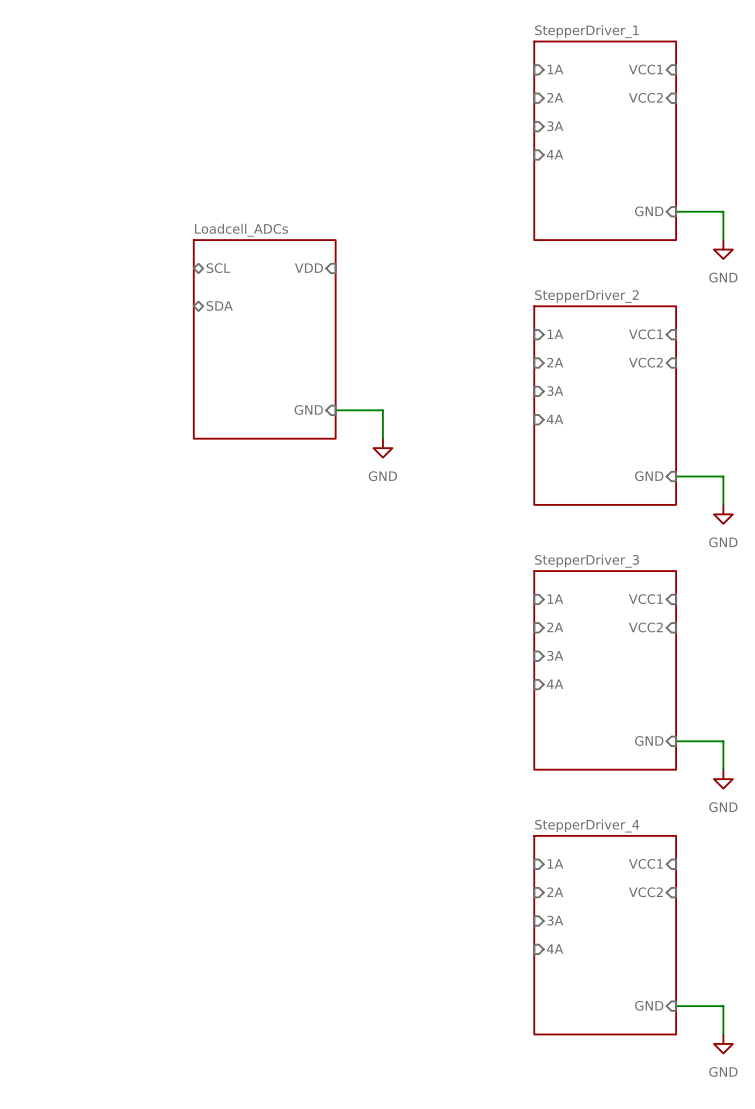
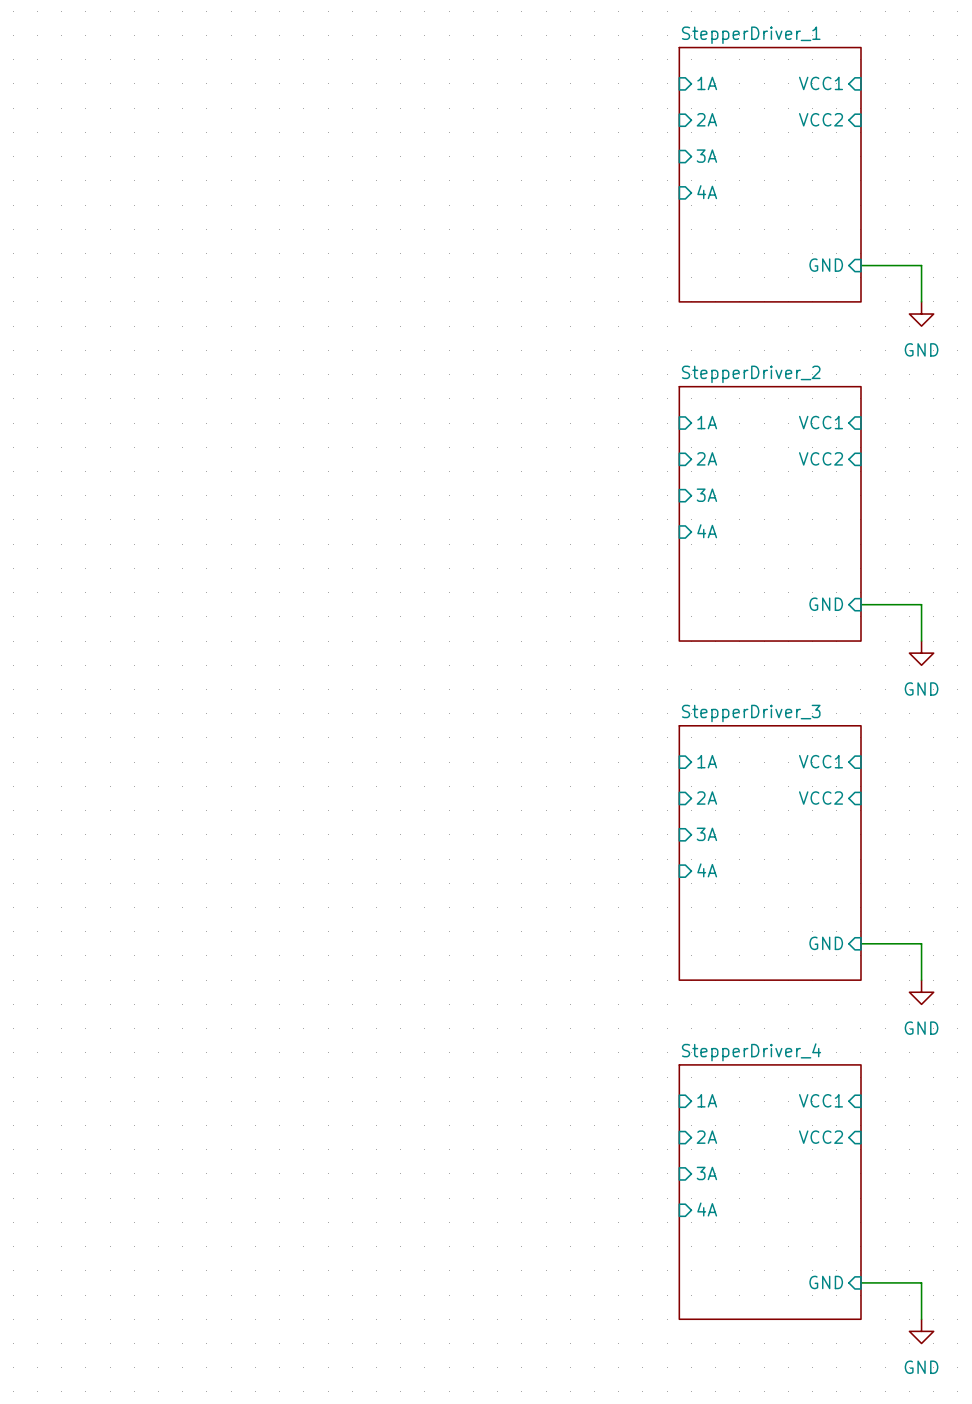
sheet pin: SCL (218, 268) -> none
sheet pin: VDD (308, 268) -> none
sheet pin: SDA (219, 305) -> none
sheet Loadcell_ADCs: (264, 339) -> none
sheet pin: GND (308, 409) -> none
wire: (335, 410) (382, 410) (382, 438) -> none
power symbol: GND (382, 448) -> none

